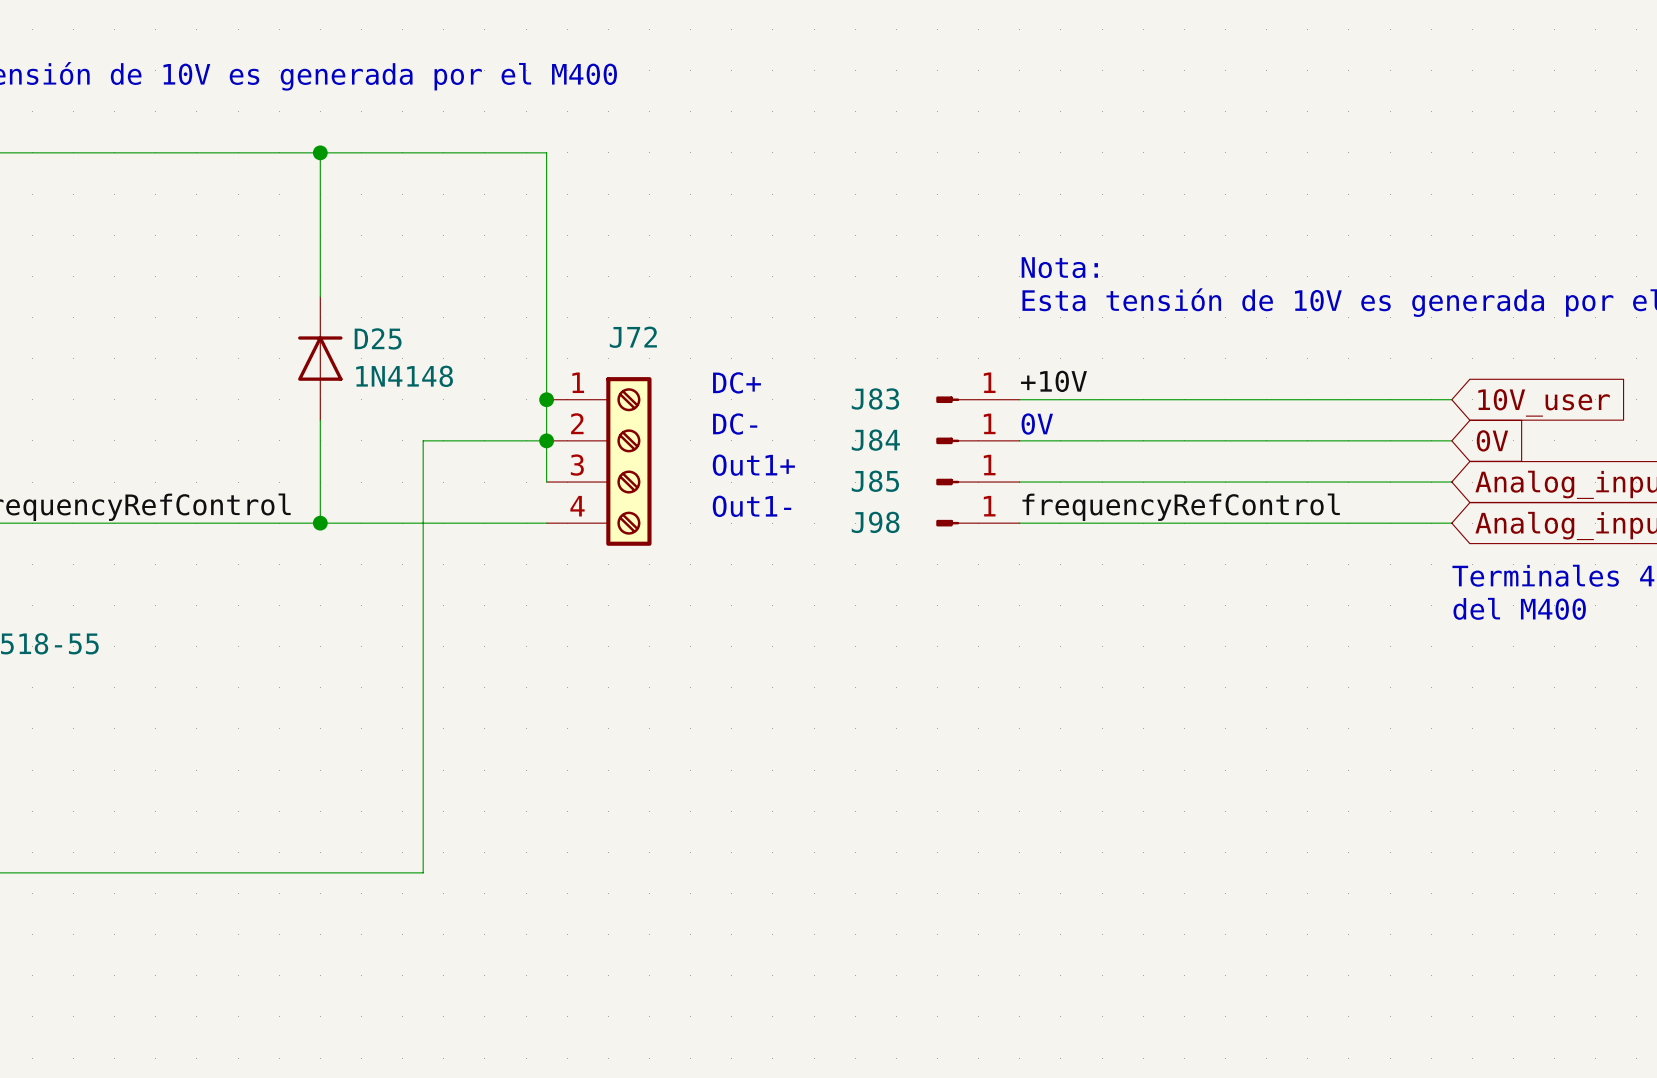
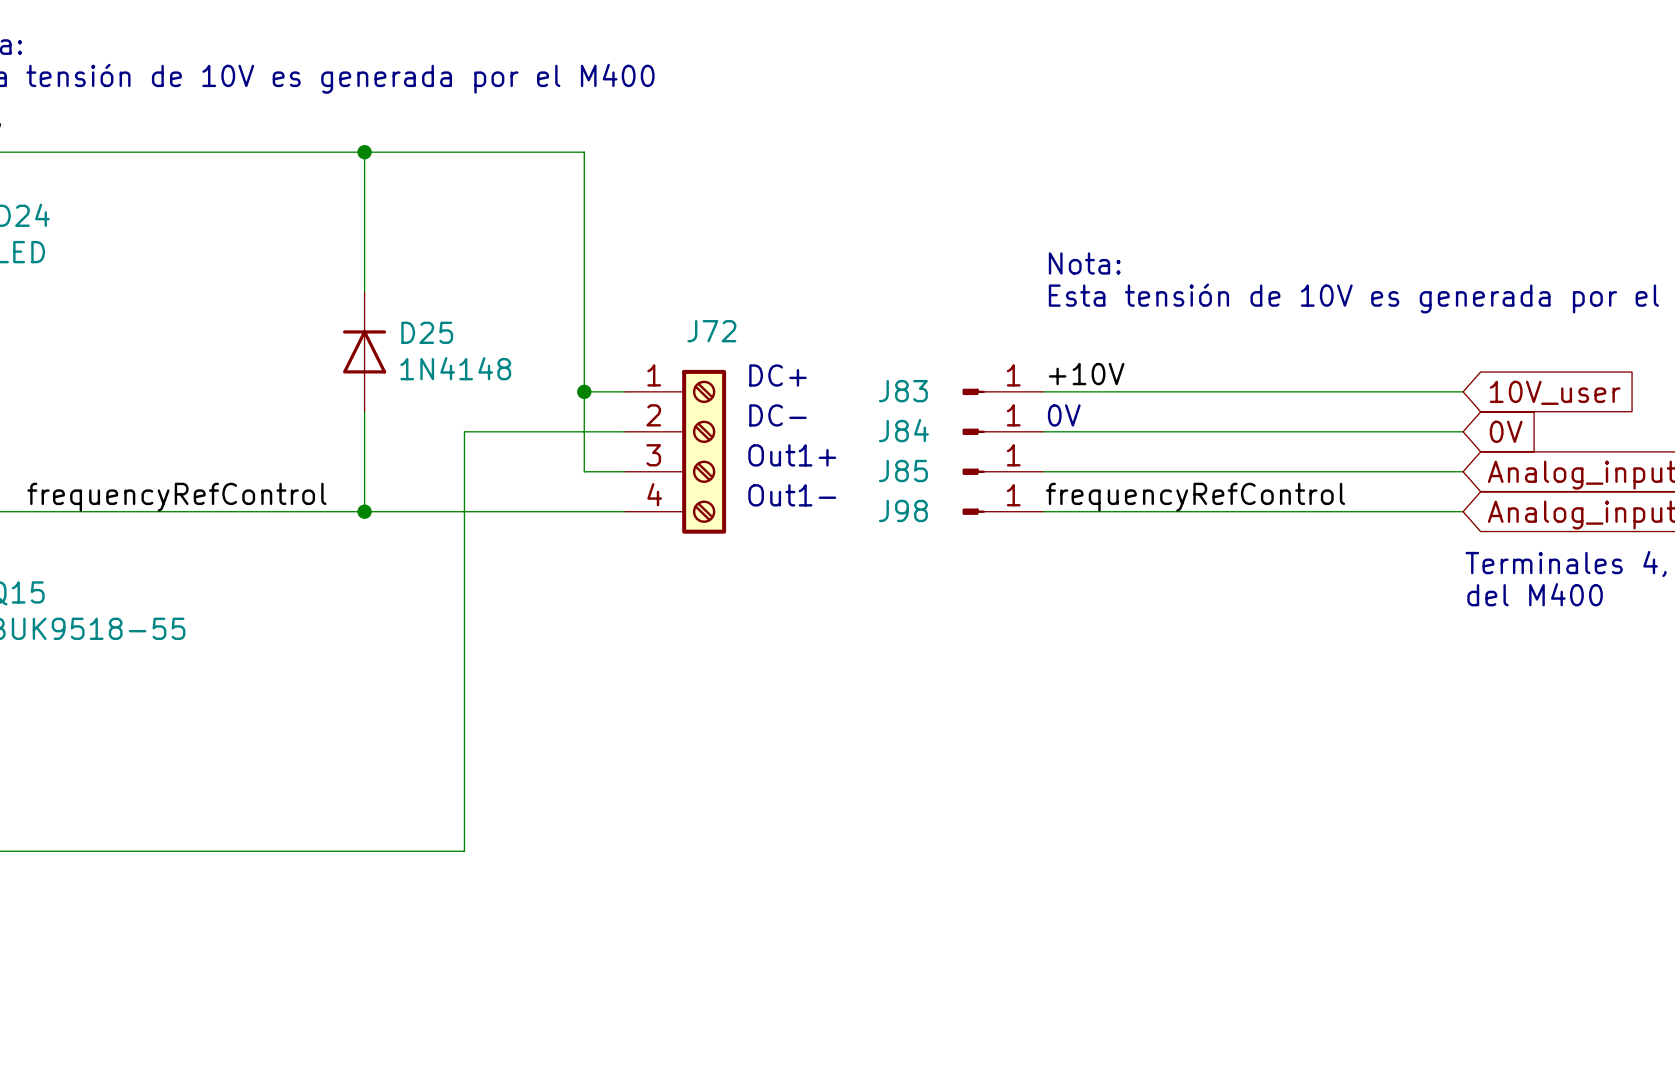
junction: (546, 440) -> none
J72 position: (599, 461) -> (675, 451)

